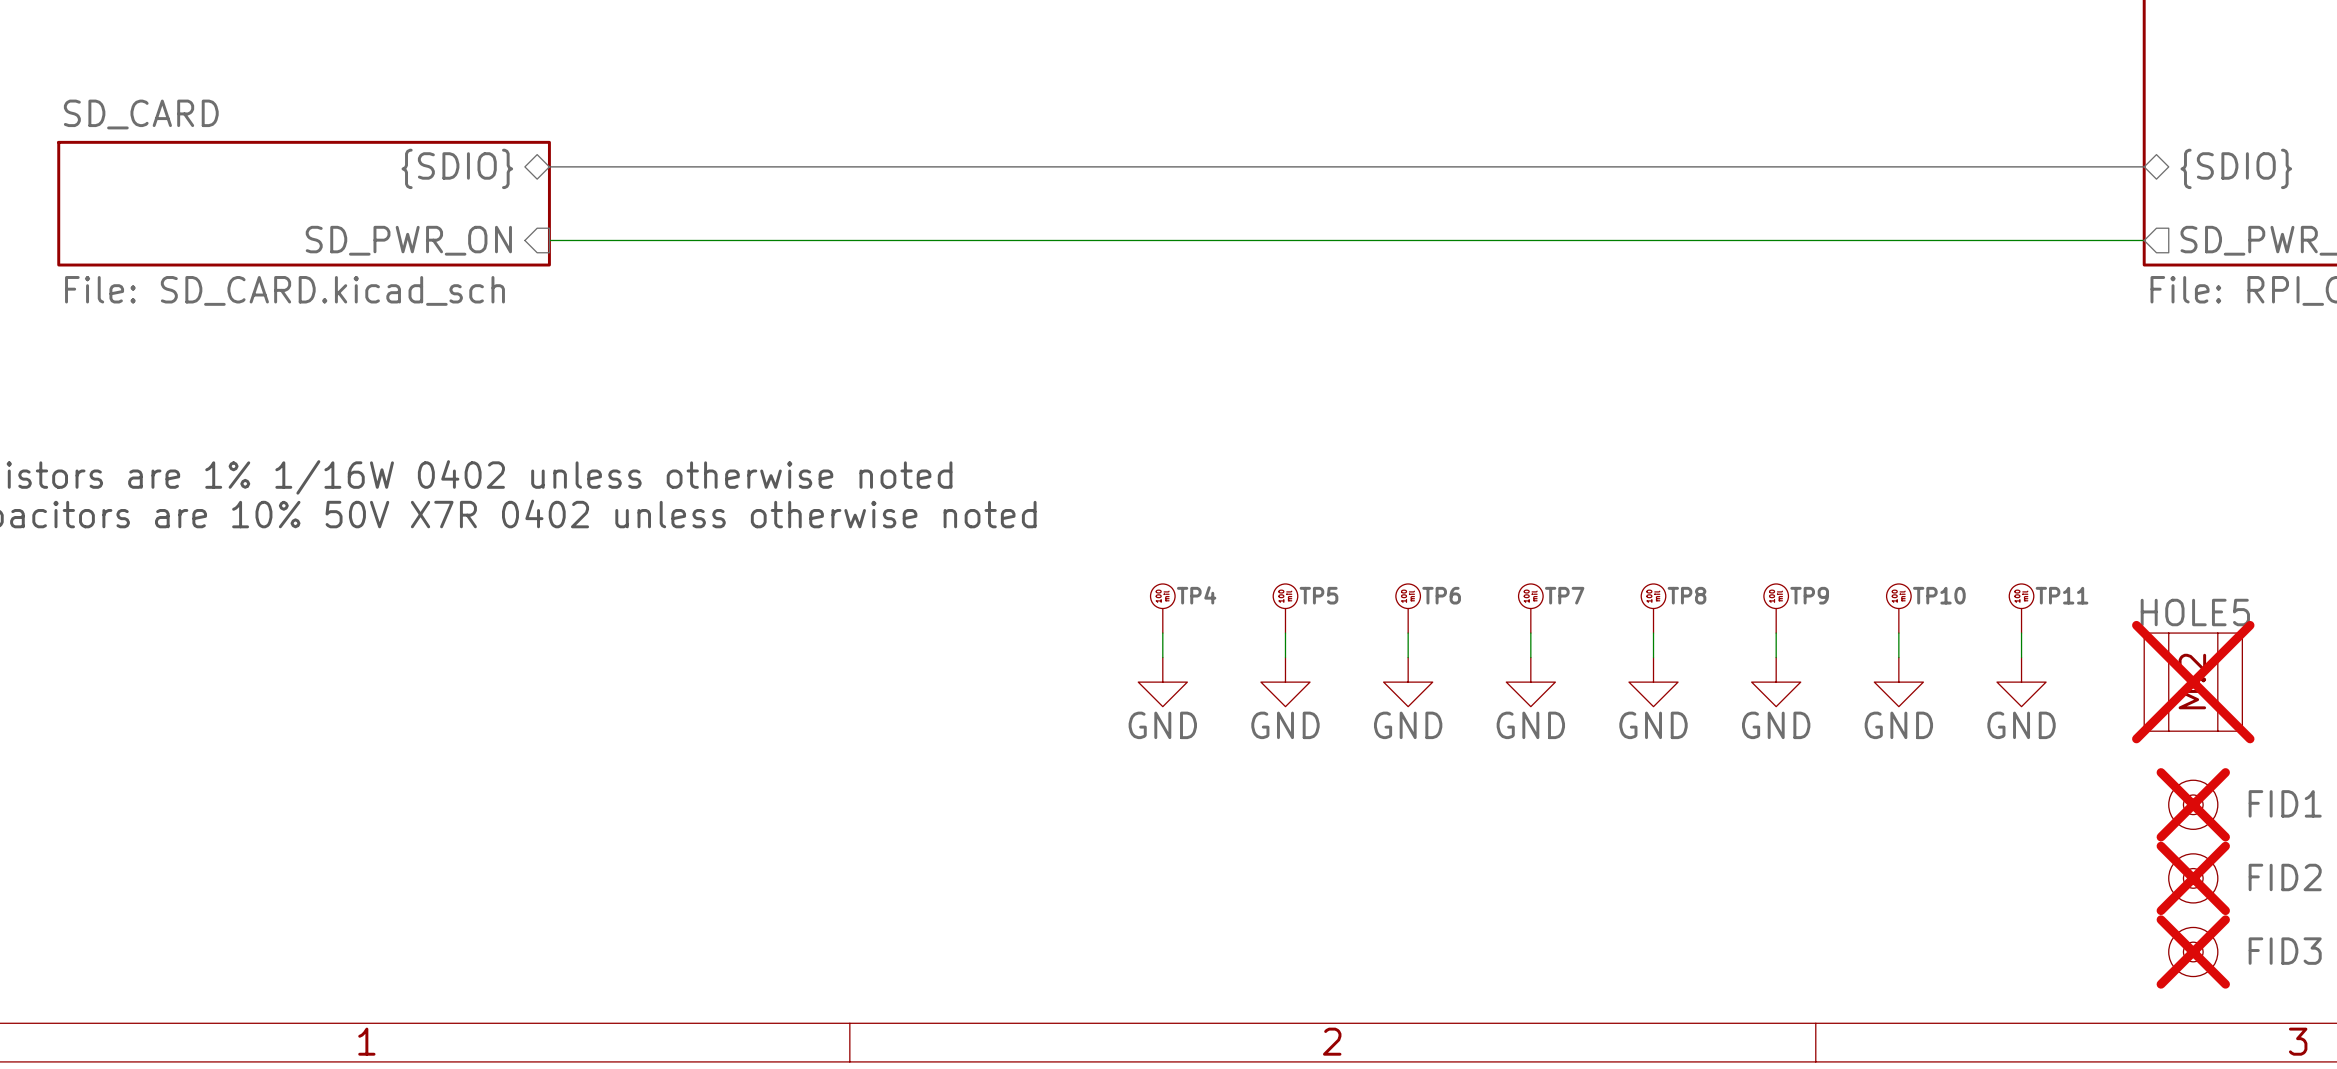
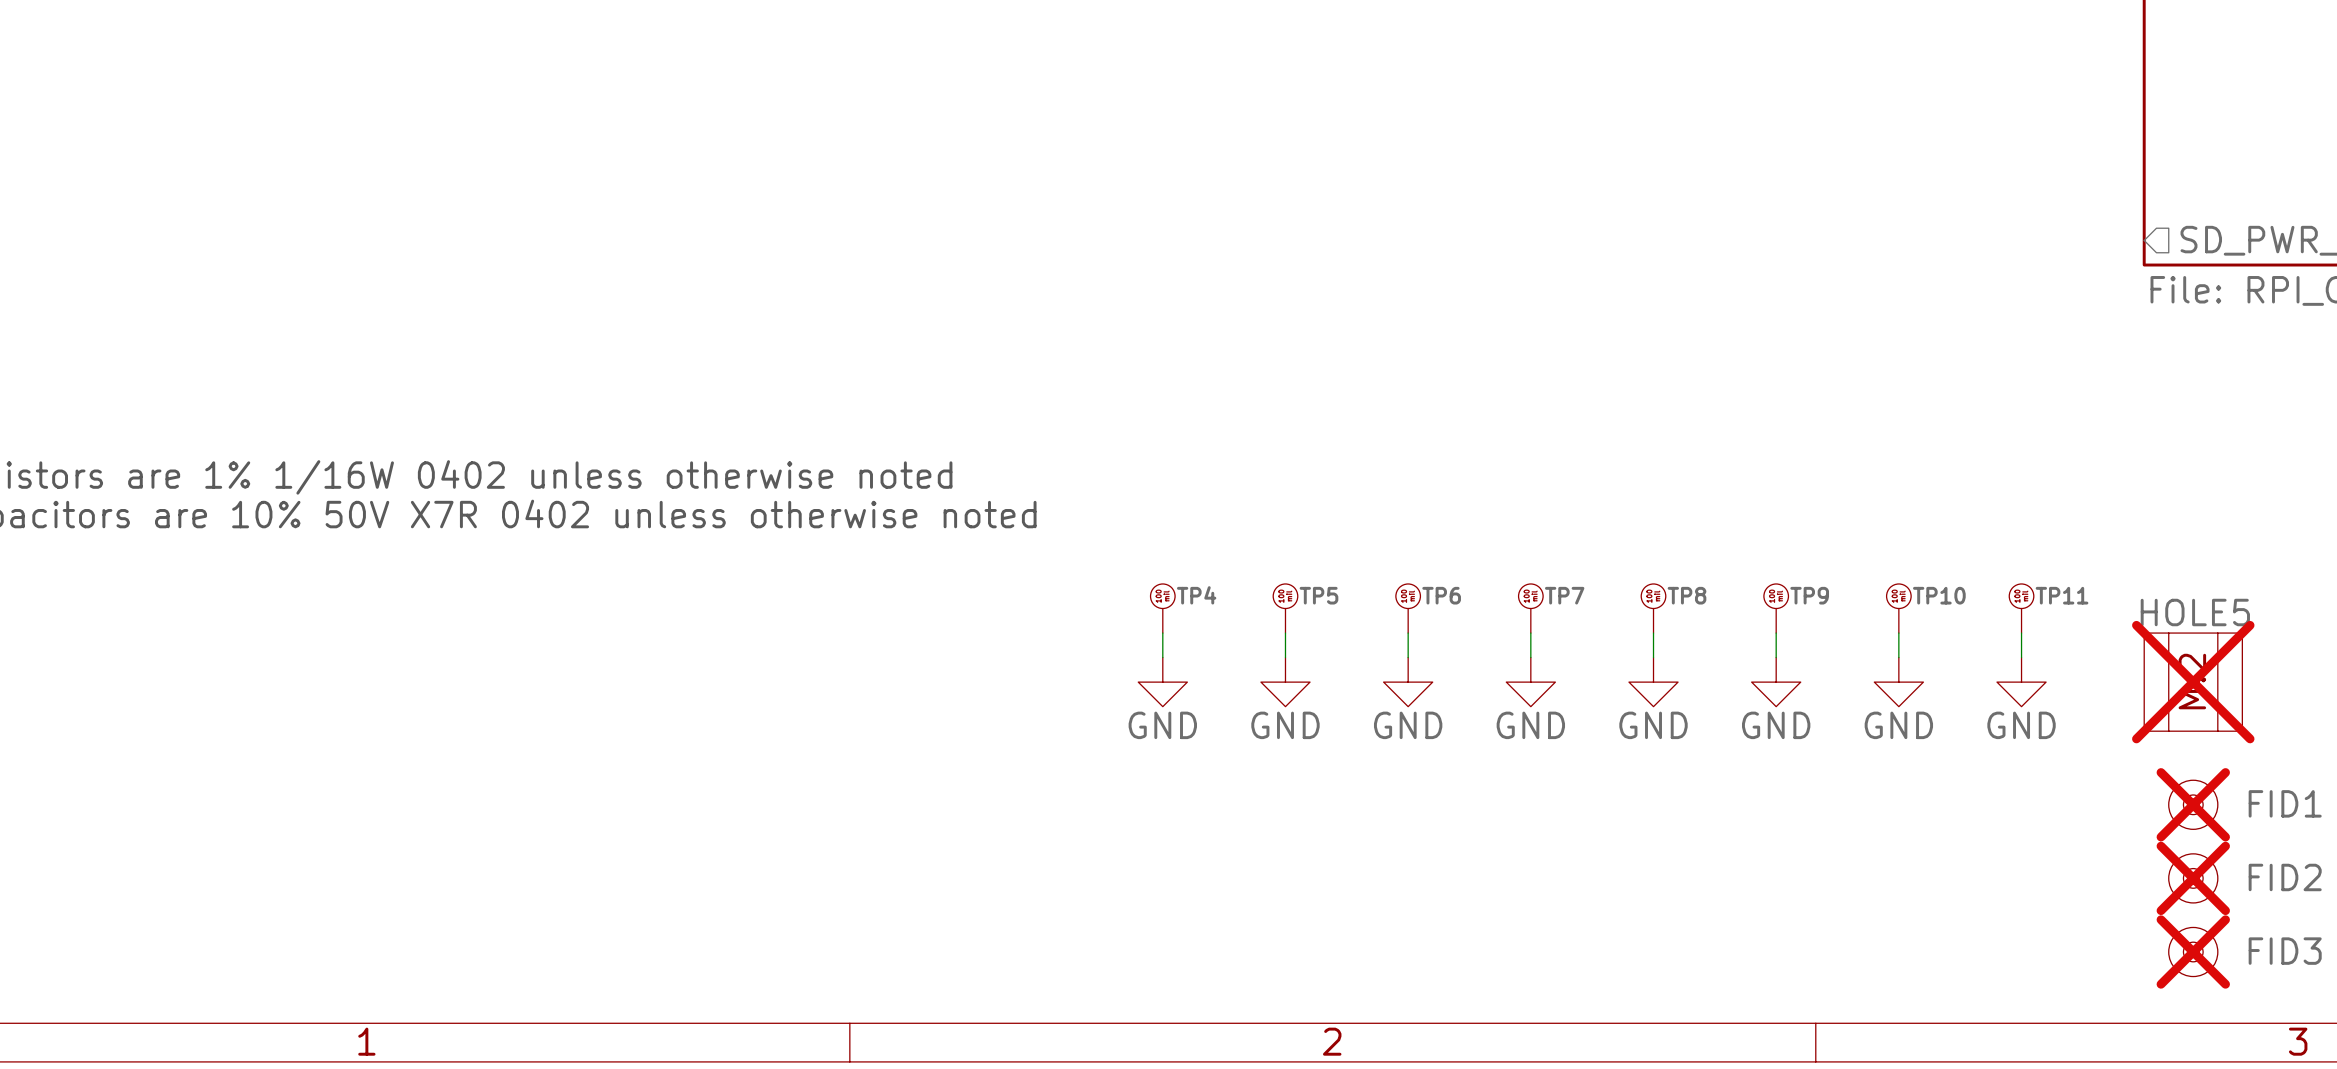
bus: (549, 166) (2144, 166) -> none
sheet pin: {SDIO} (457, 168) -> none
sheet pin: {SDIO} (2236, 168) -> none
sheet SD_CARD: File: SD_CARD.kicad_sch (304, 203) -> none
sheet pin: SD_PWR_ON (408, 240) -> none
wire: (549, 240) (2144, 240) -> none

